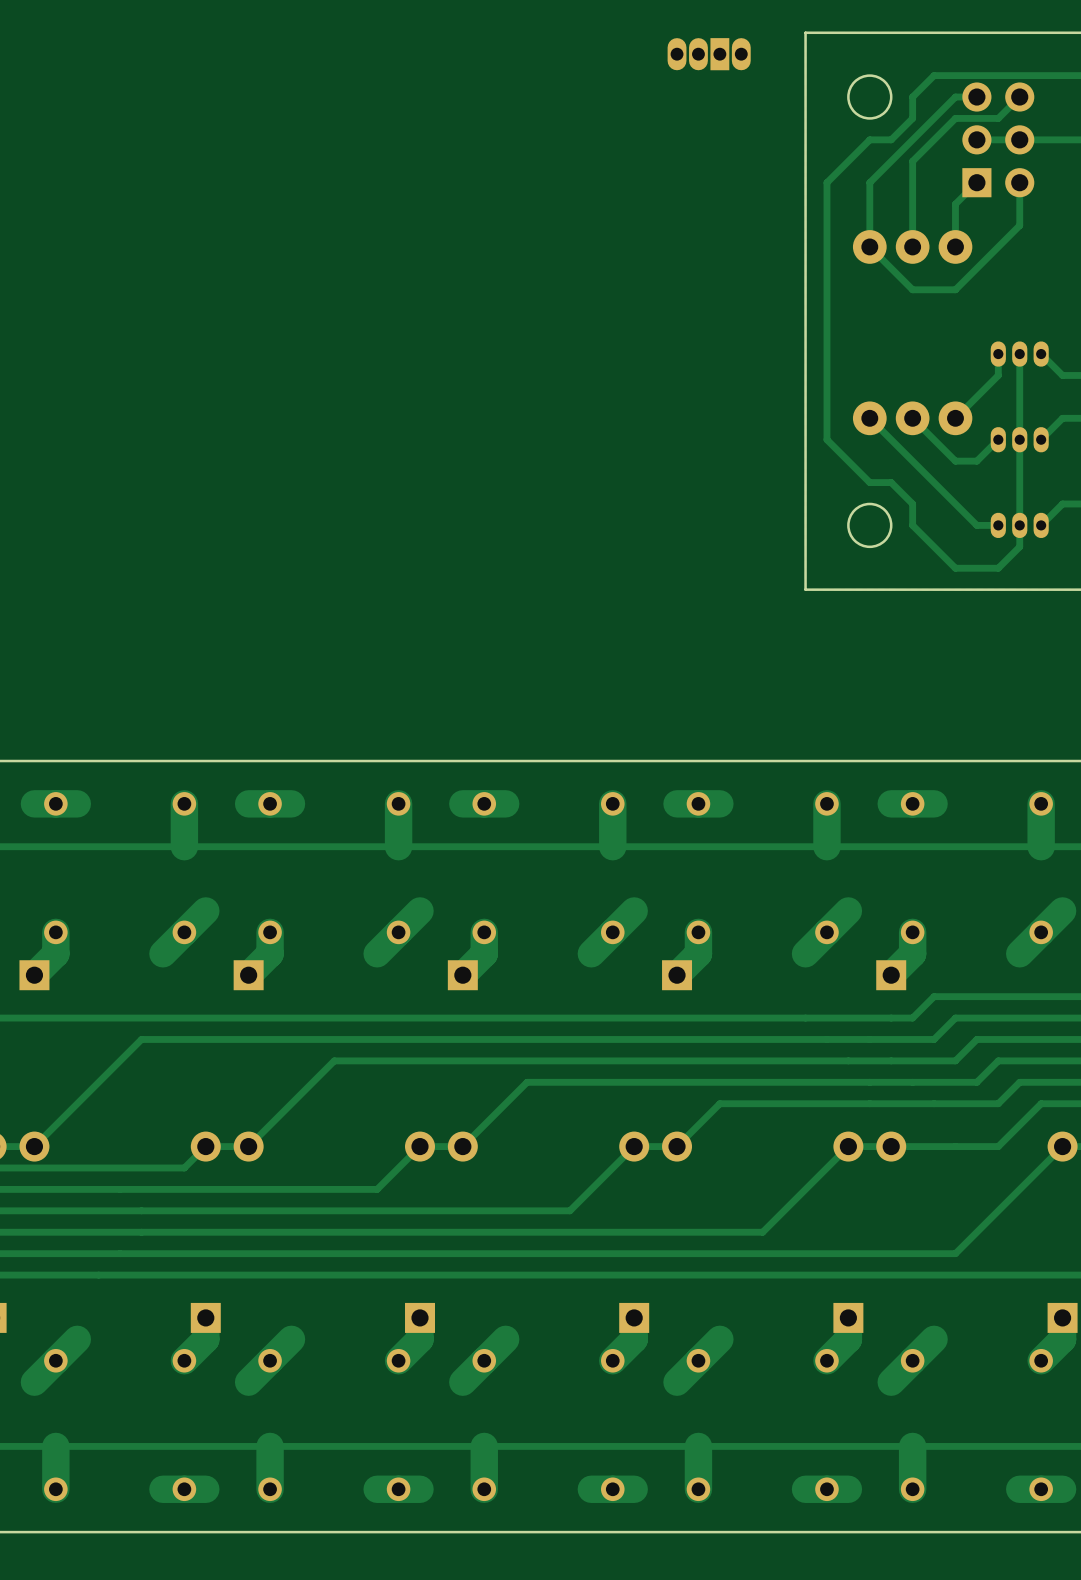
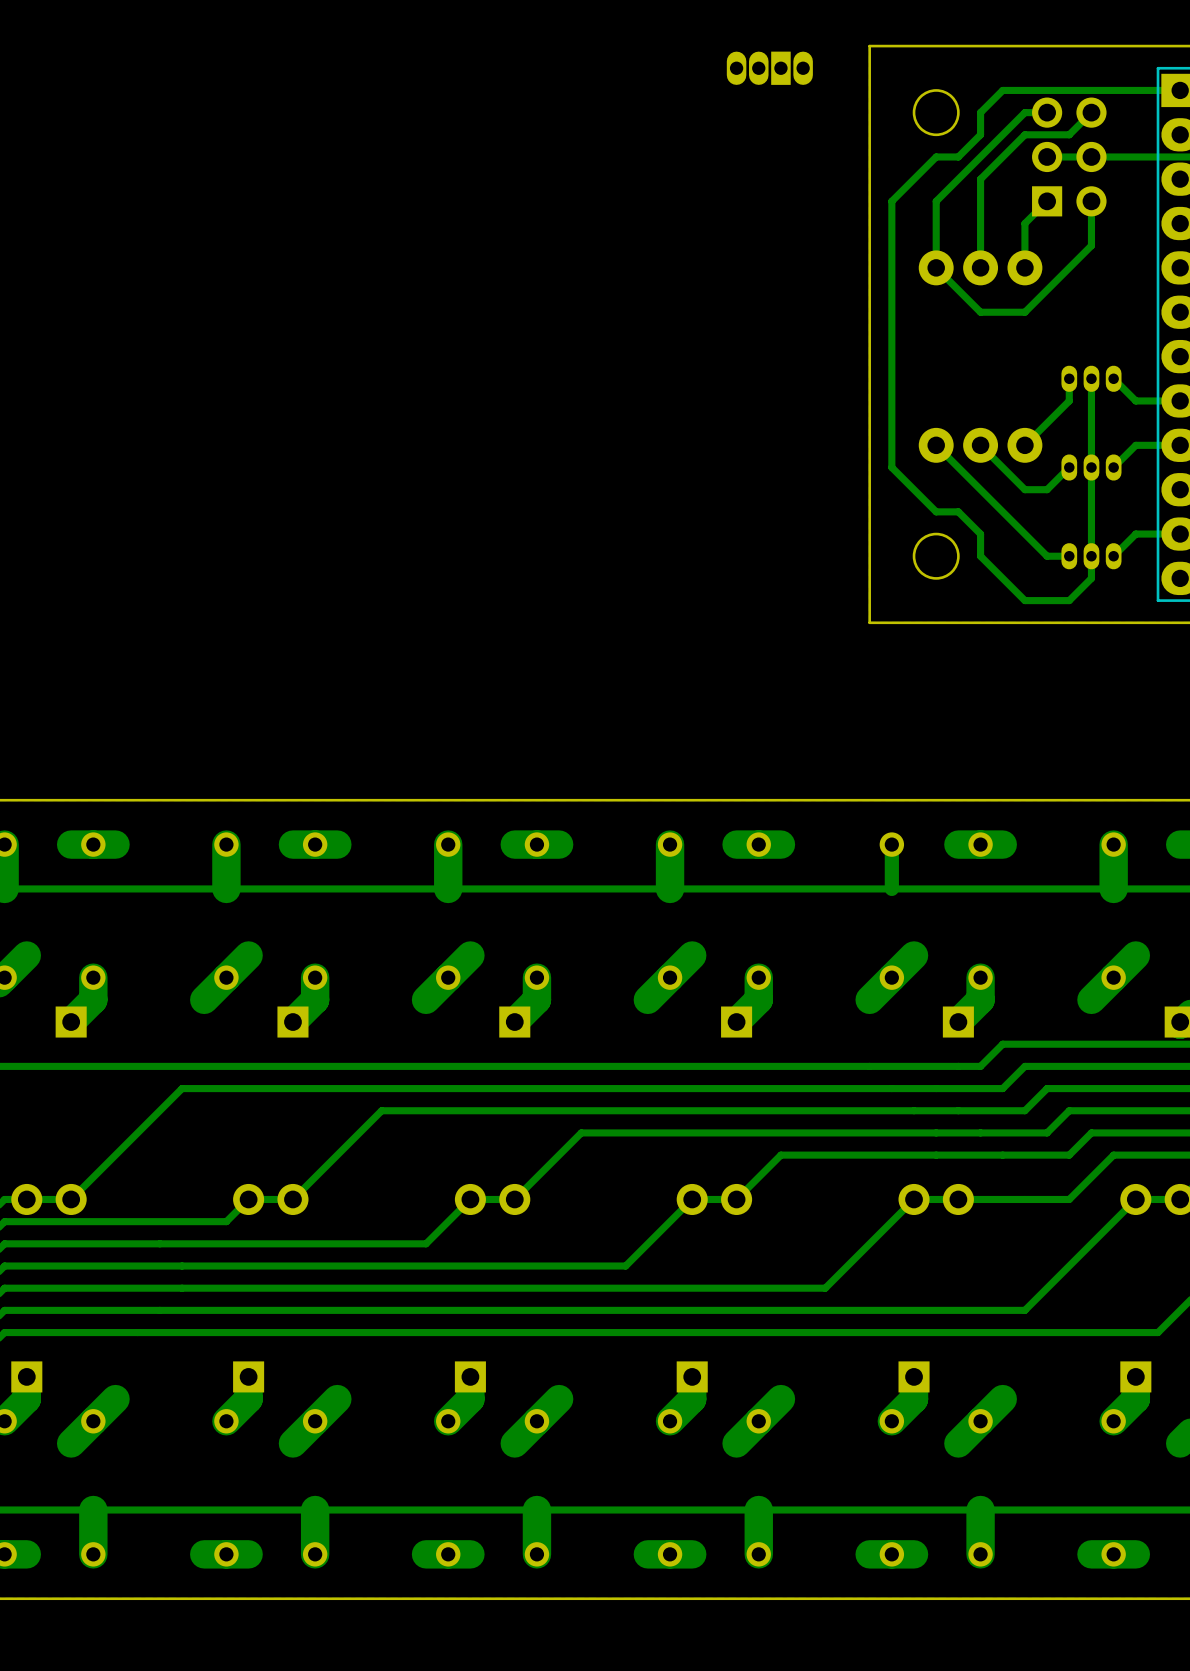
track width: thick (826, 803) (826, 846) -> thin (891, 844) (891, 888)

